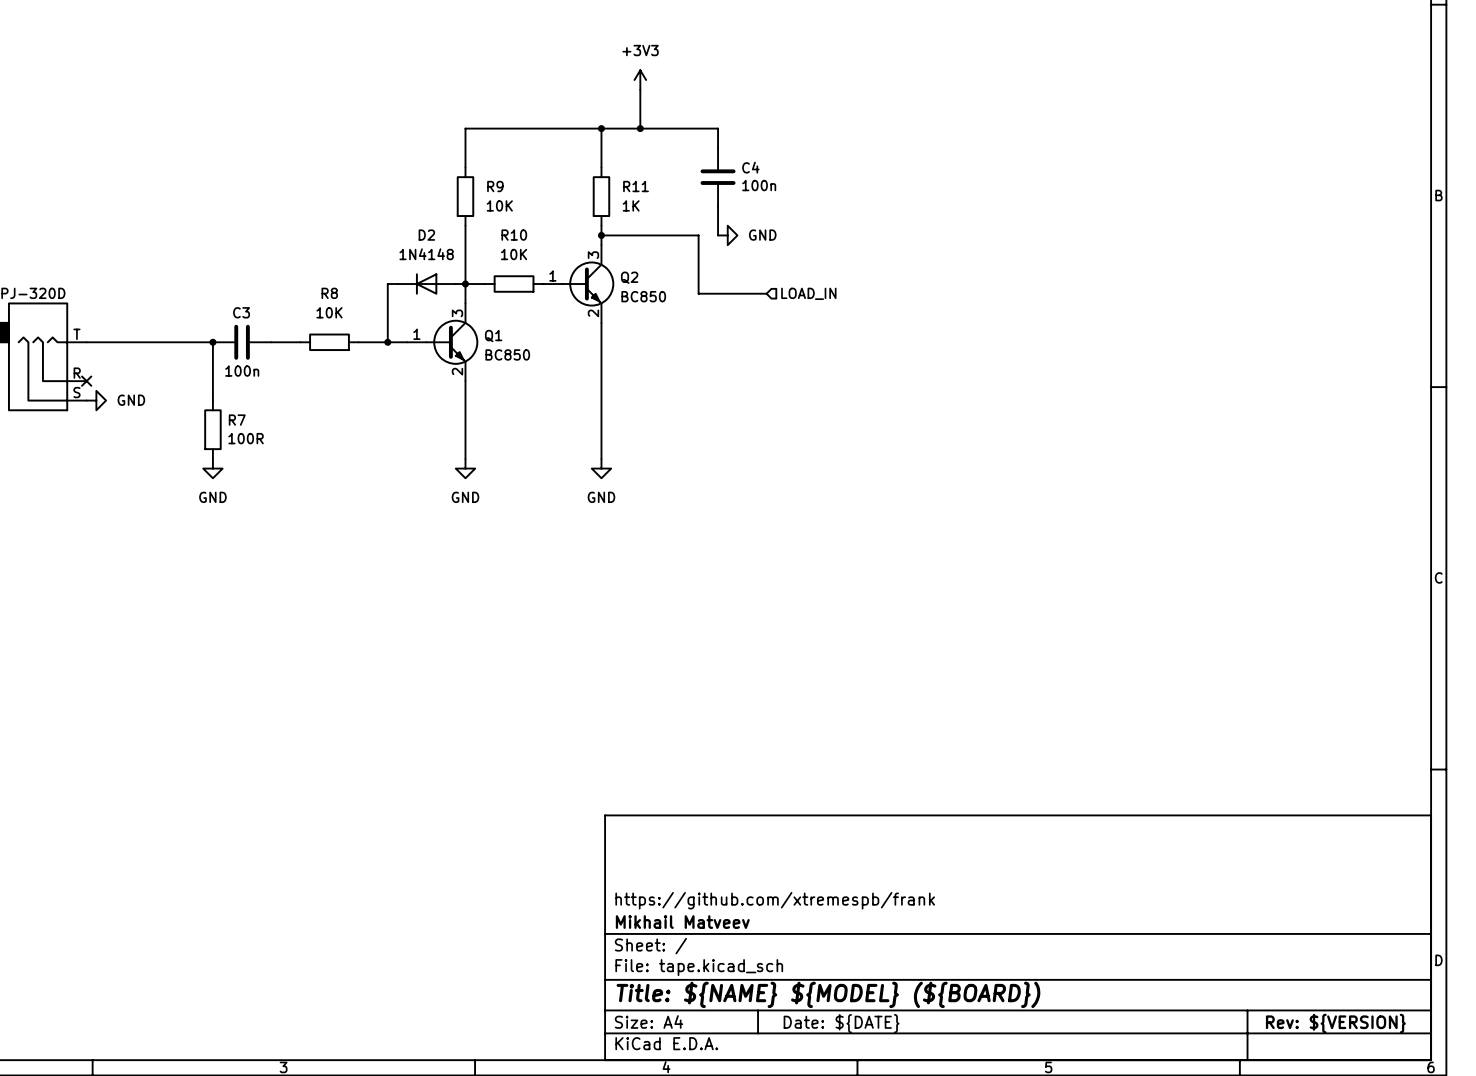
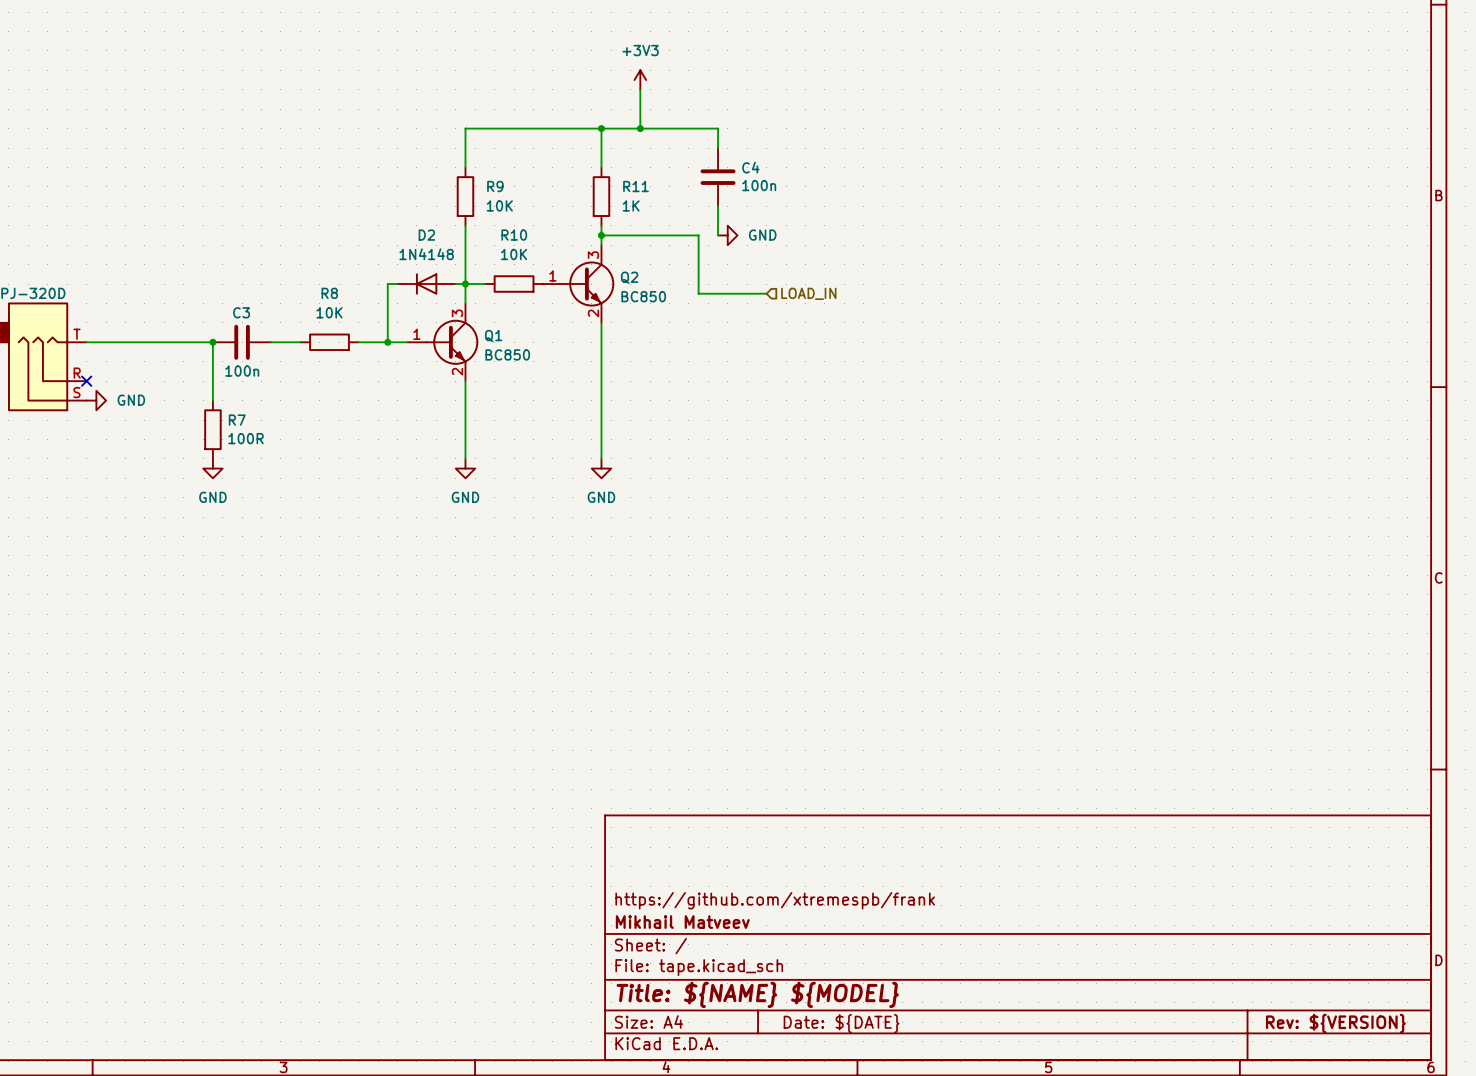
title block: Title: ${NAME} ${MODEL} (${BOARD}) (828, 994) -> Title: ${NAME} ${MODEL} (757, 994)

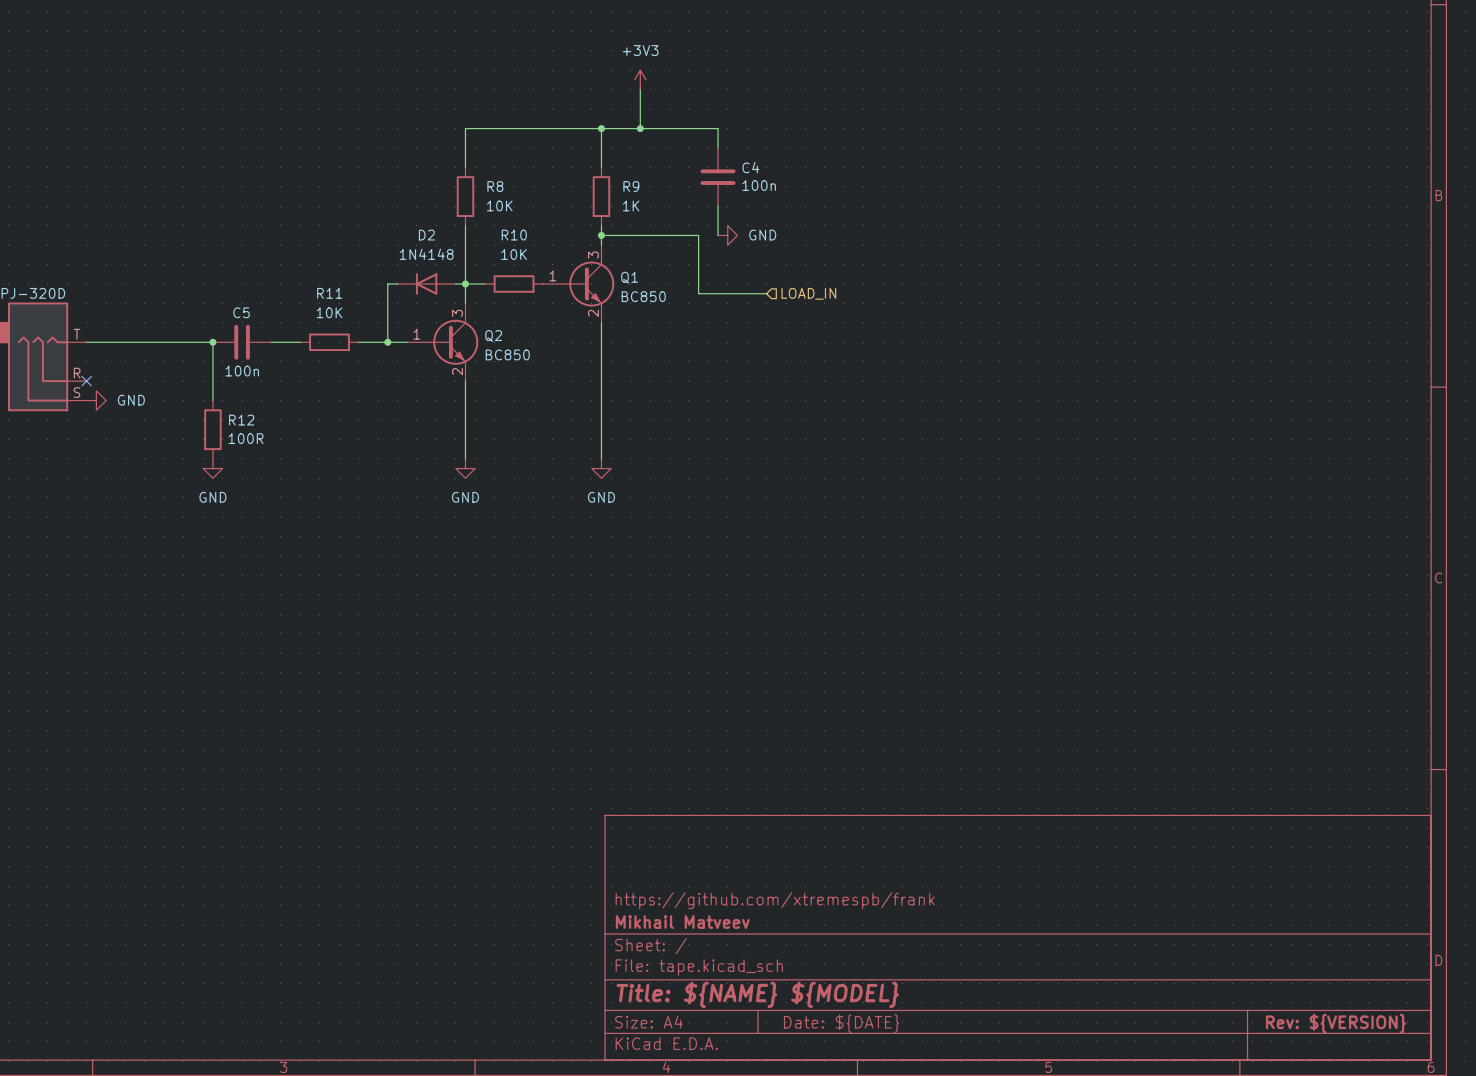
R9 name: R9 (495, 186) -> R8 (495, 186)
R11 name: R11 (636, 186) -> R9 (631, 186)
Q2 name: Q2 (629, 277) -> Q1 (629, 277)
R8 name: R8 (329, 293) -> R11 (329, 293)
C3 name: C3 (241, 312) -> C5 (241, 312)
Q1 name: Q1 (493, 336) -> Q2 (493, 336)
R7 name: R7 (237, 420) -> R12 (241, 420)

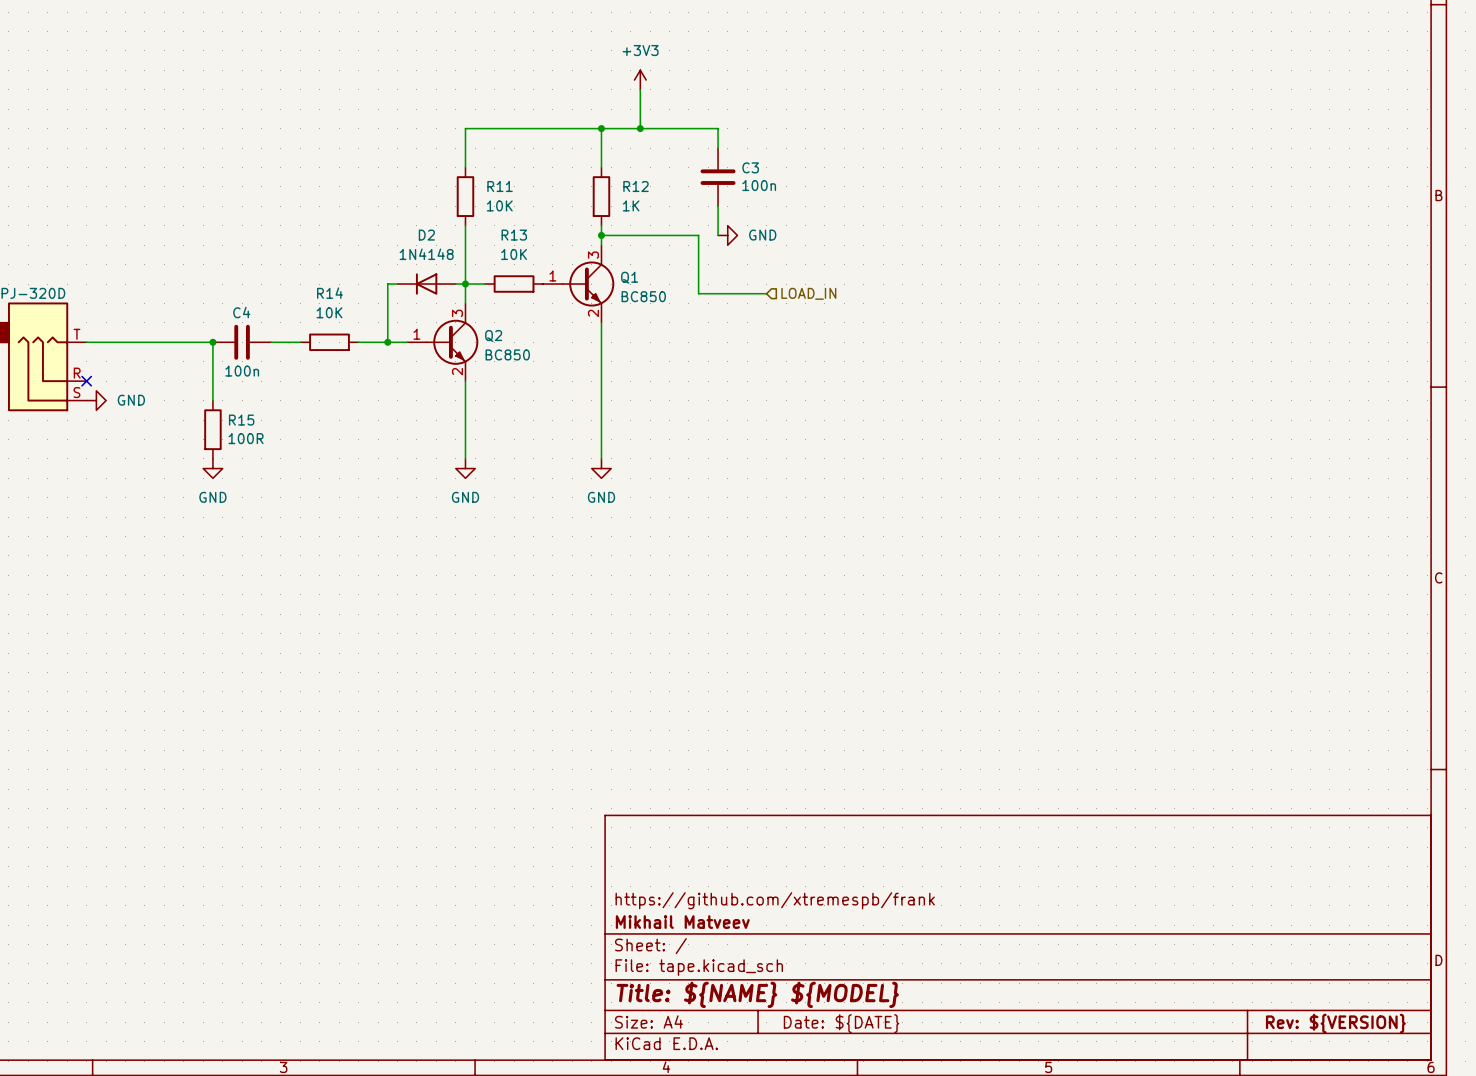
C4 name: C4 (750, 167) -> C3 (750, 167)
R8 name: R8 (495, 186) -> R11 (500, 186)
R9 name: R9 (631, 186) -> R12 (636, 186)
R10 name: R10 (514, 235) -> R13 (514, 235)
R11 name: R11 (329, 293) -> R14 (329, 293)
C5 name: C5 (241, 312) -> C4 (241, 312)
R12 name: R12 (241, 420) -> R15 (241, 420)

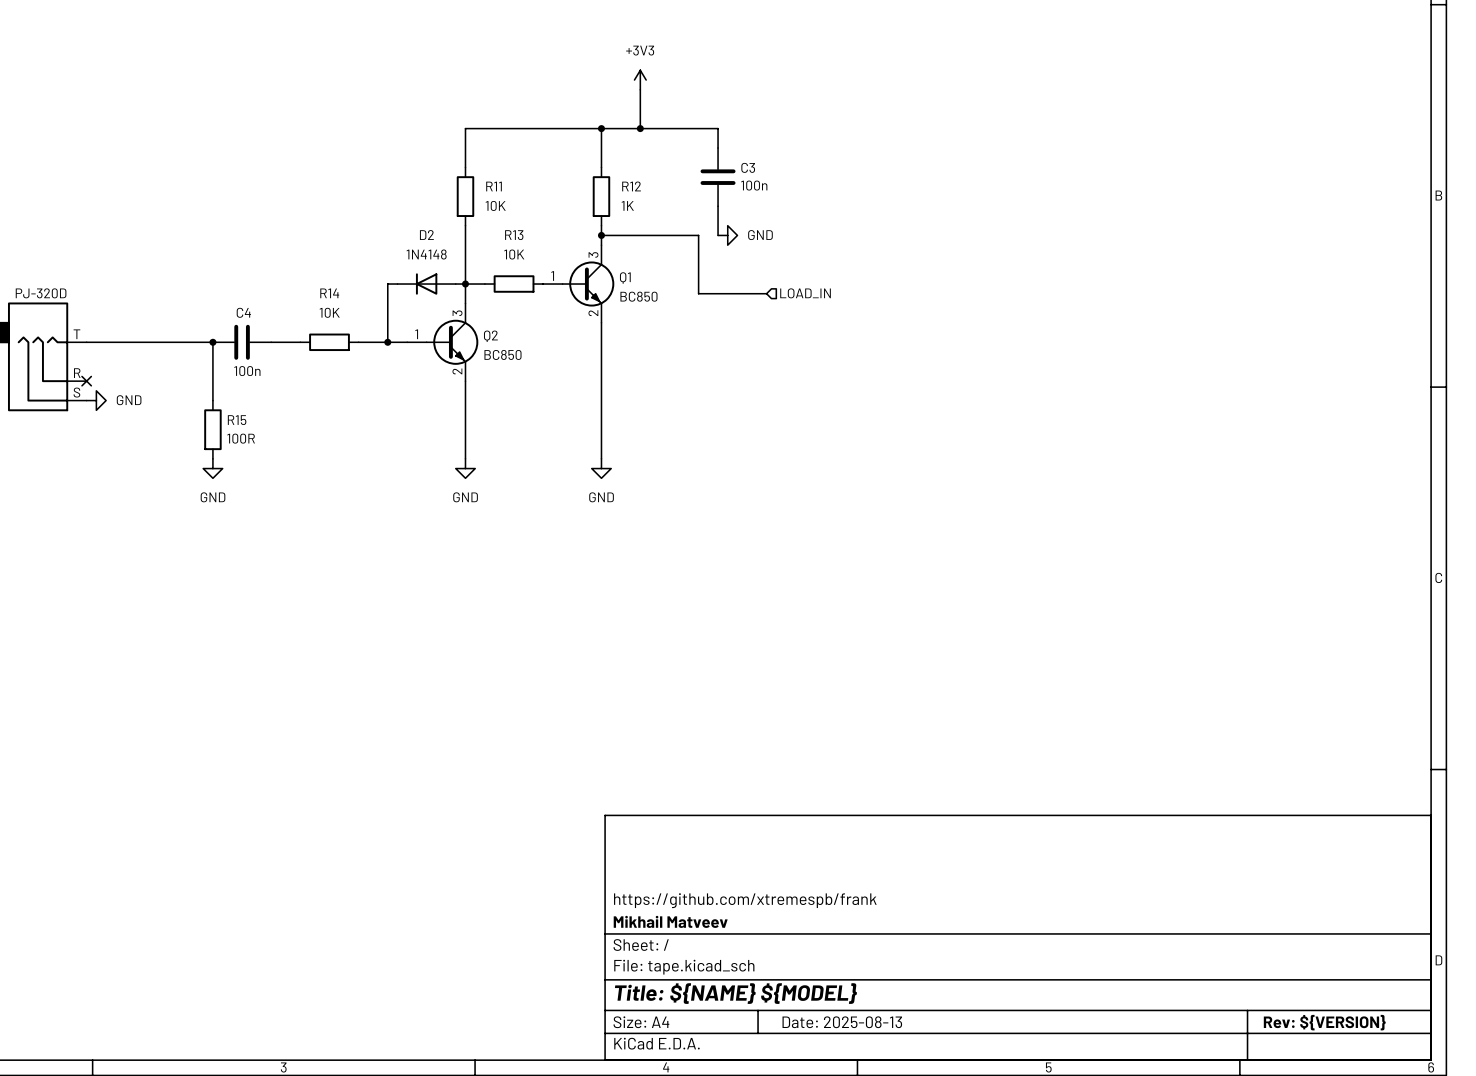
title block: Date: ${DATE} (841, 1023) -> Date: 2025-08-13 (842, 1022)

